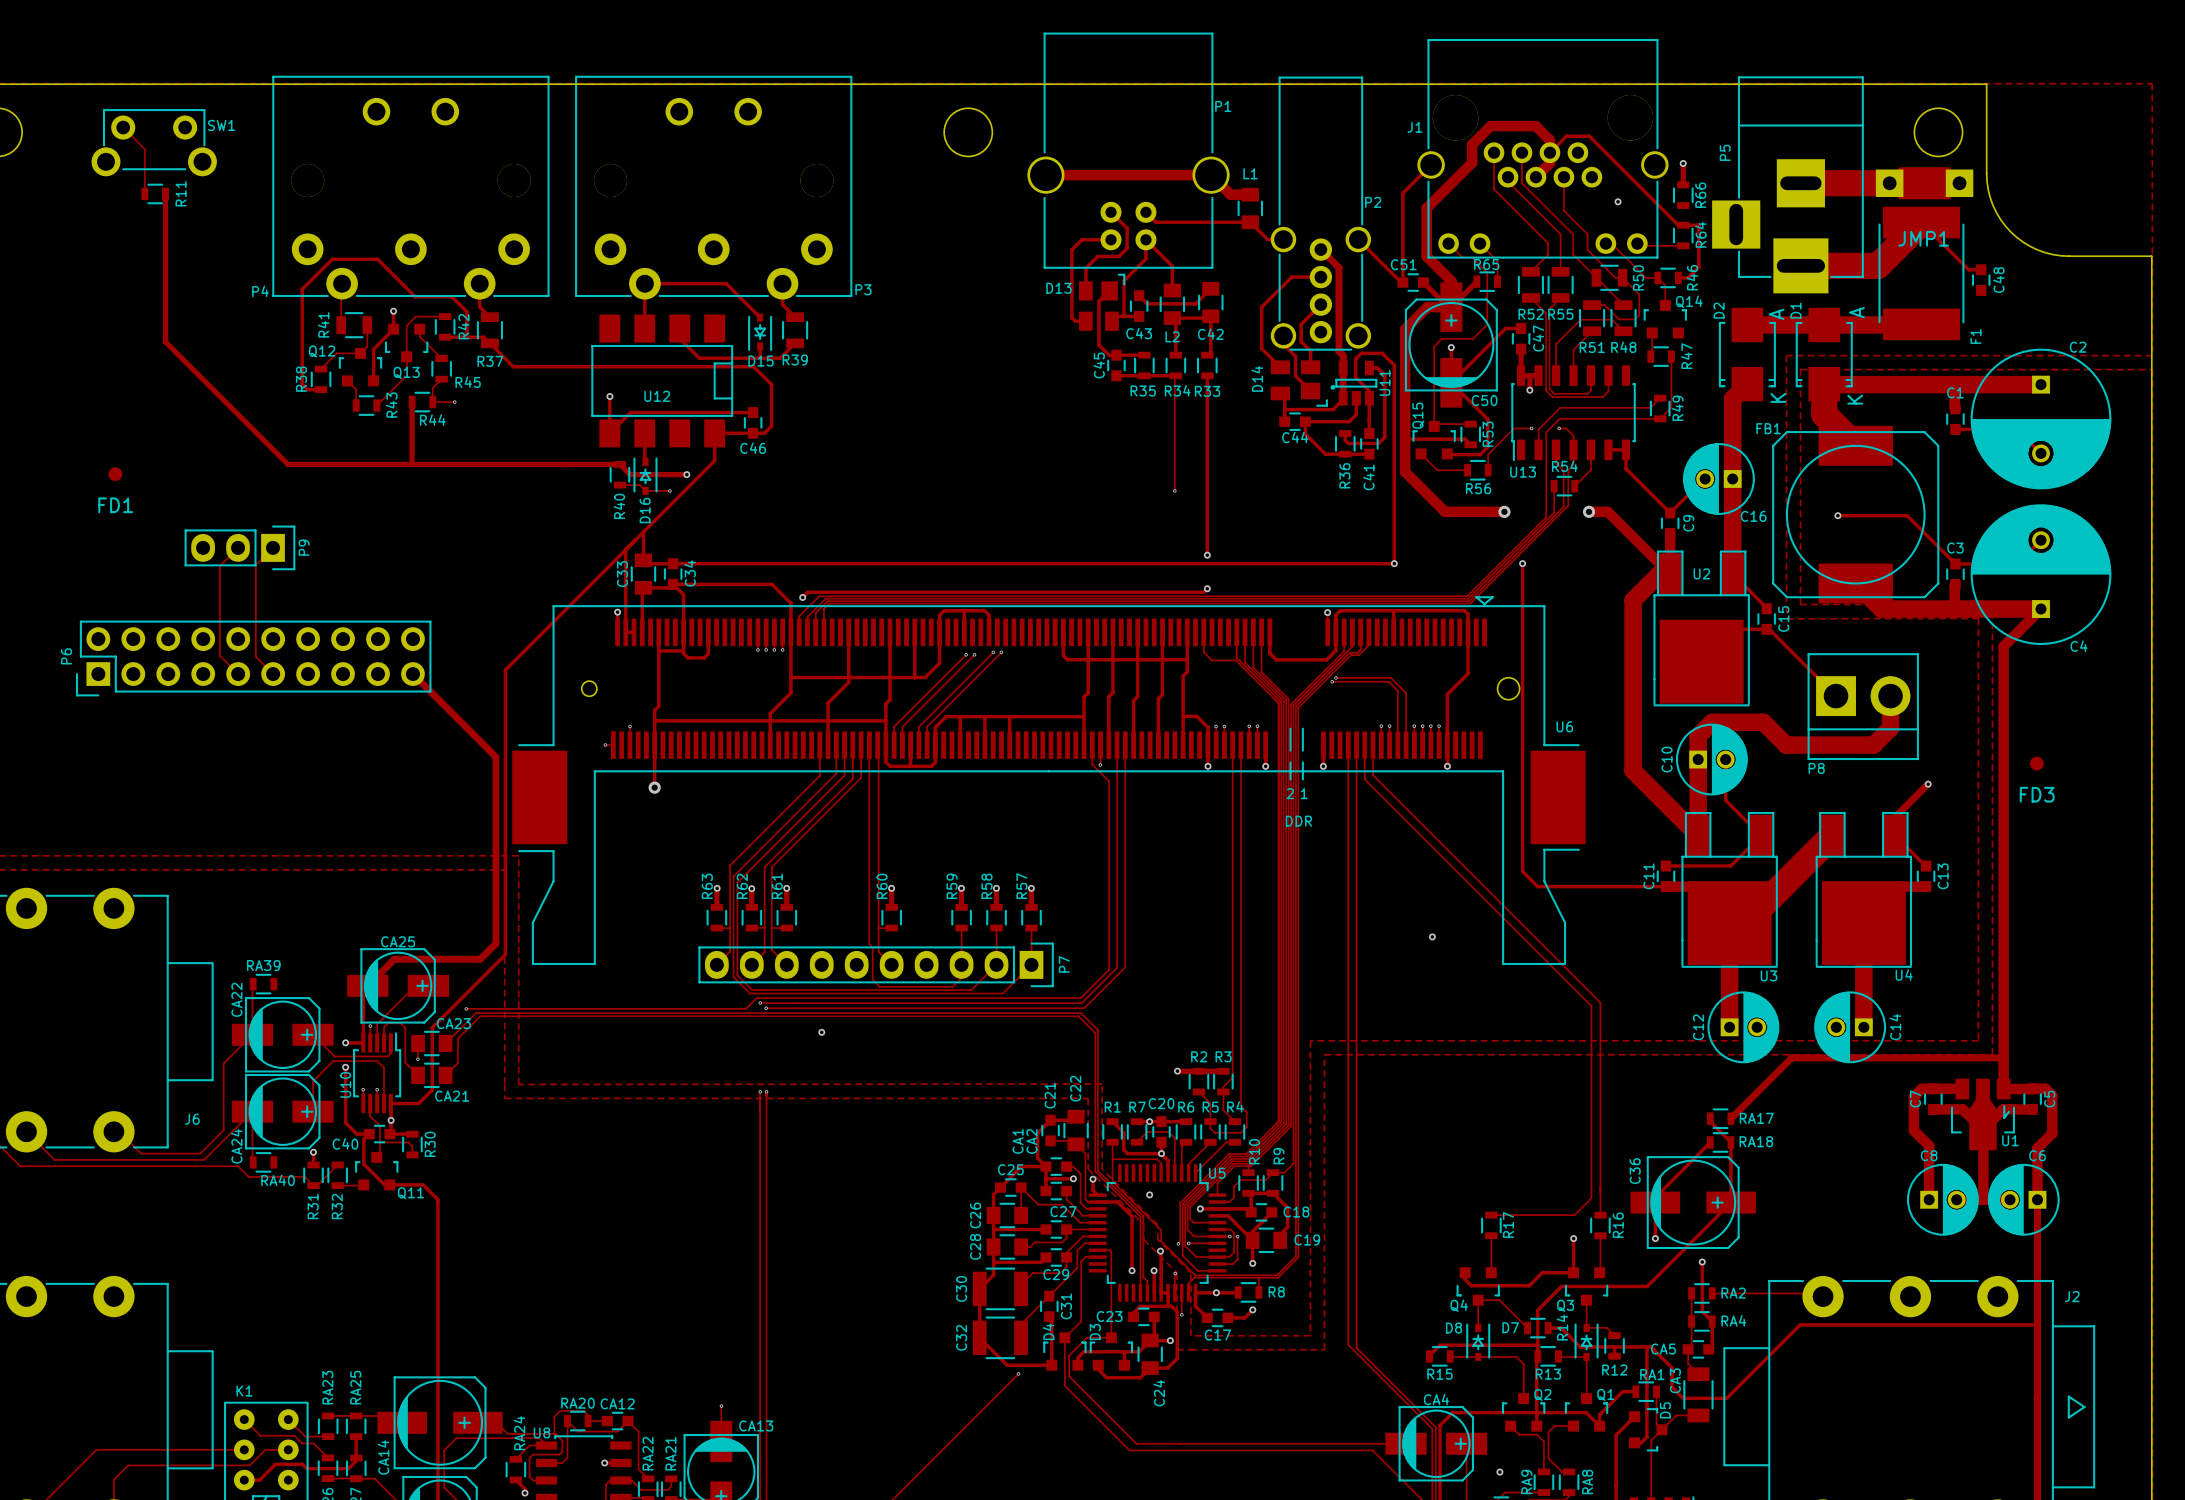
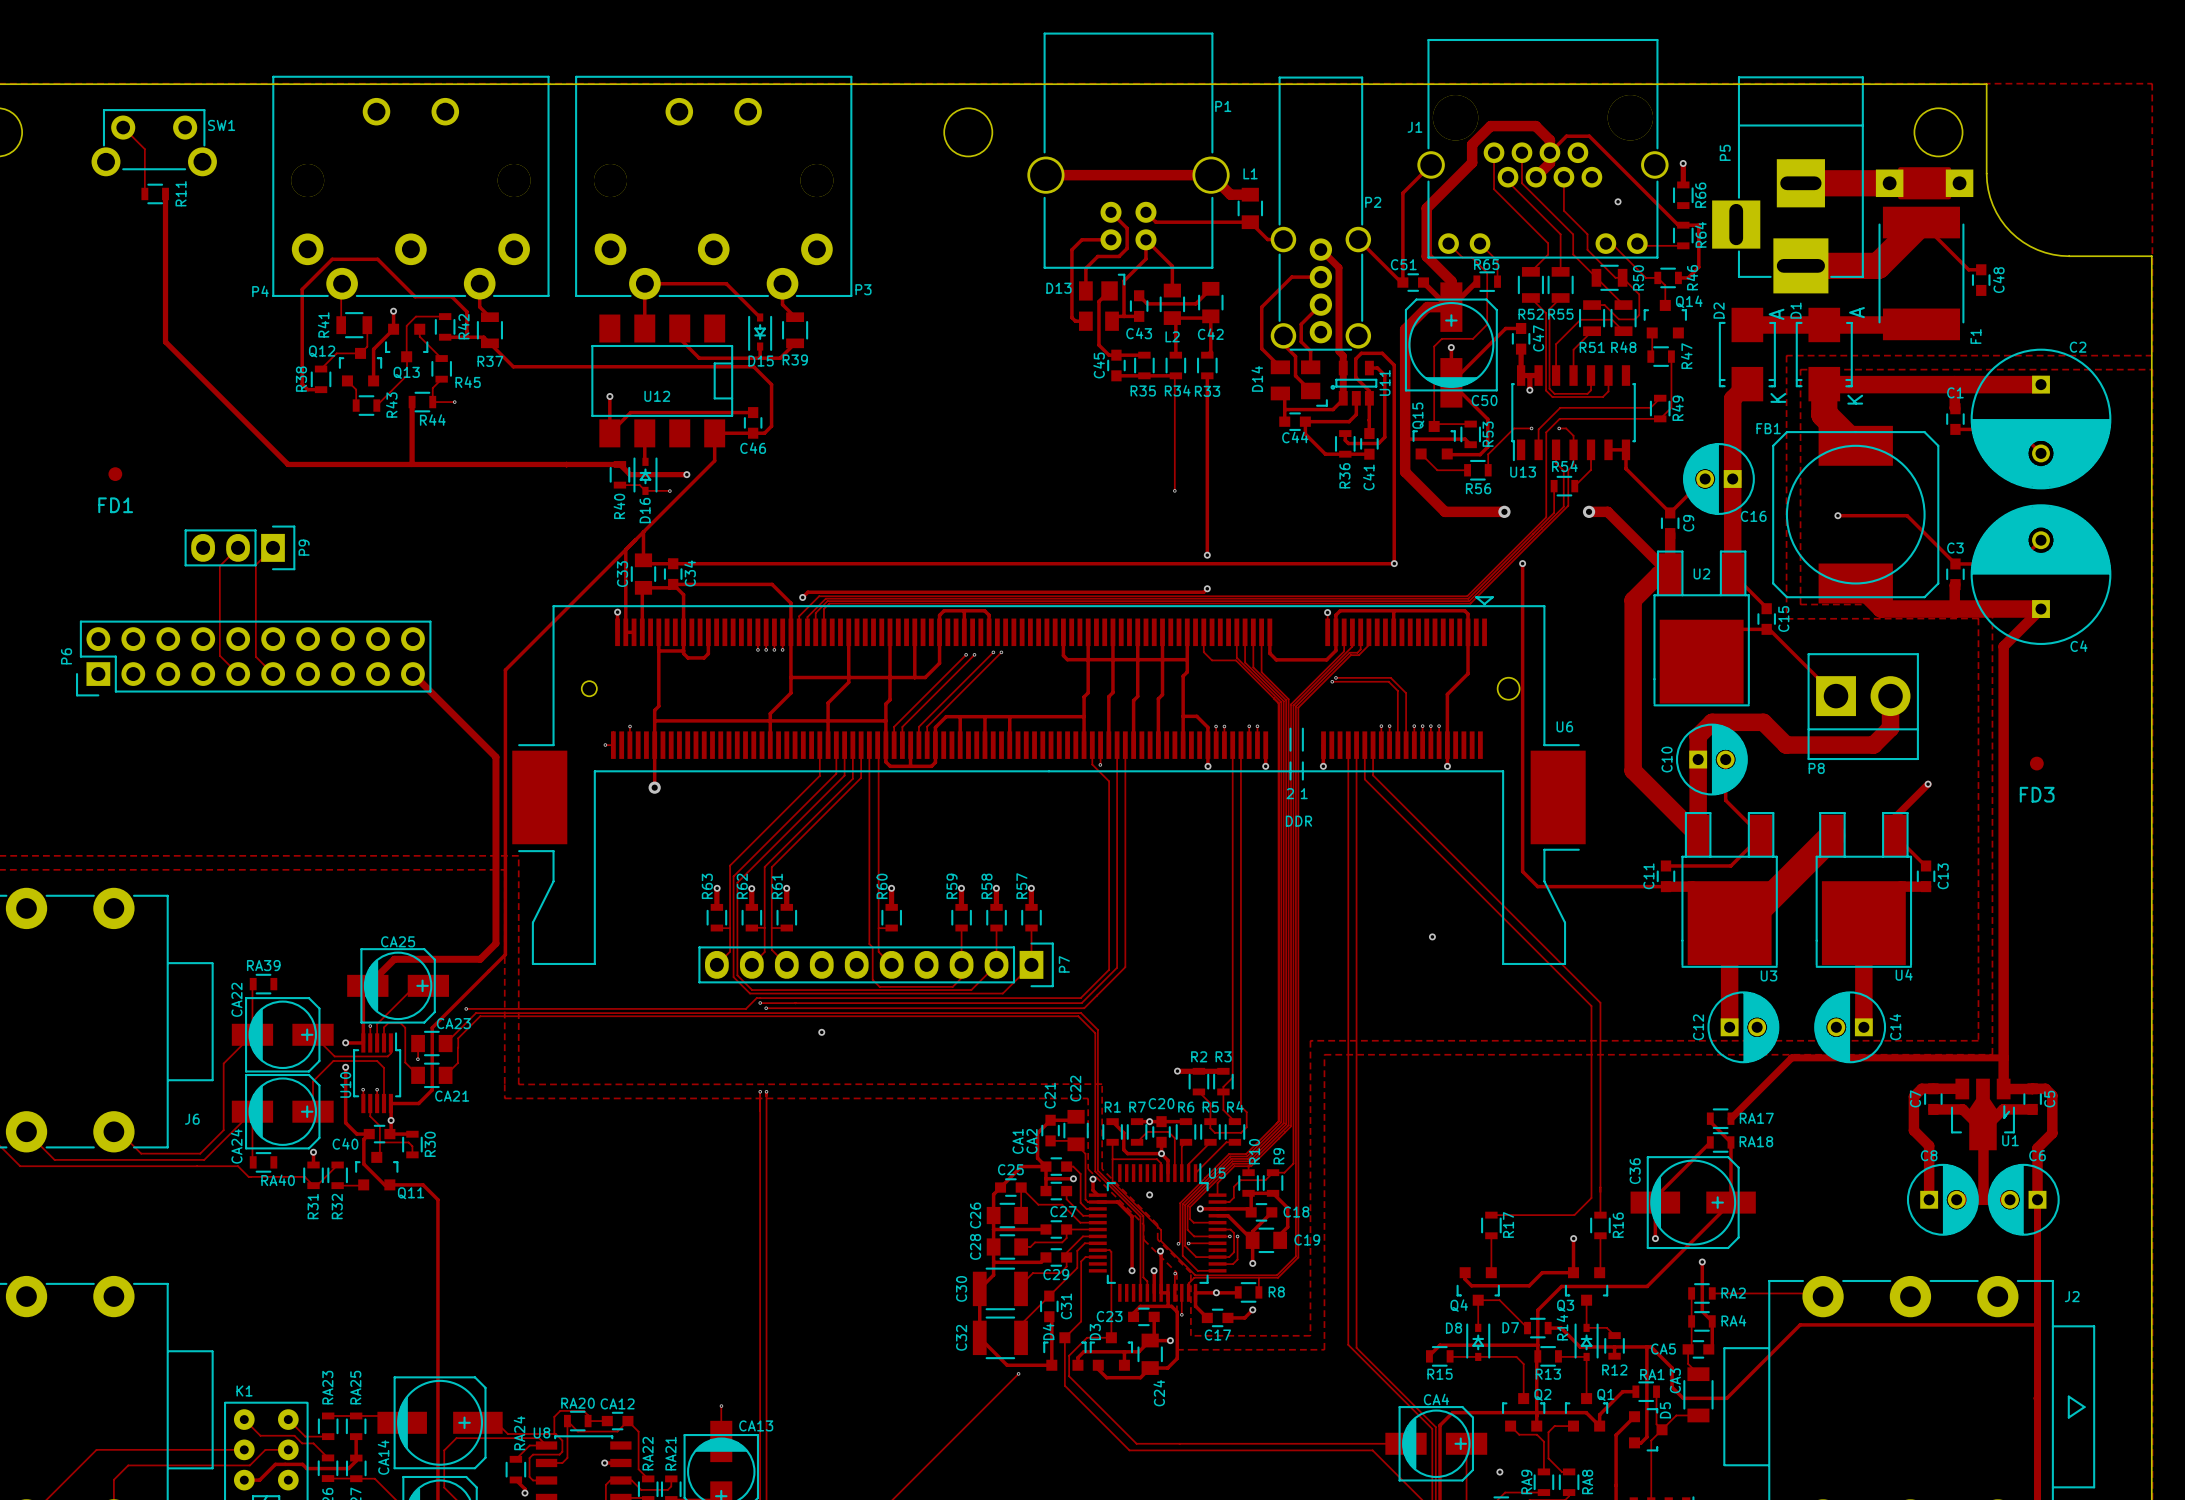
JMP1 name: JMP1 (1923, 238) -> none

